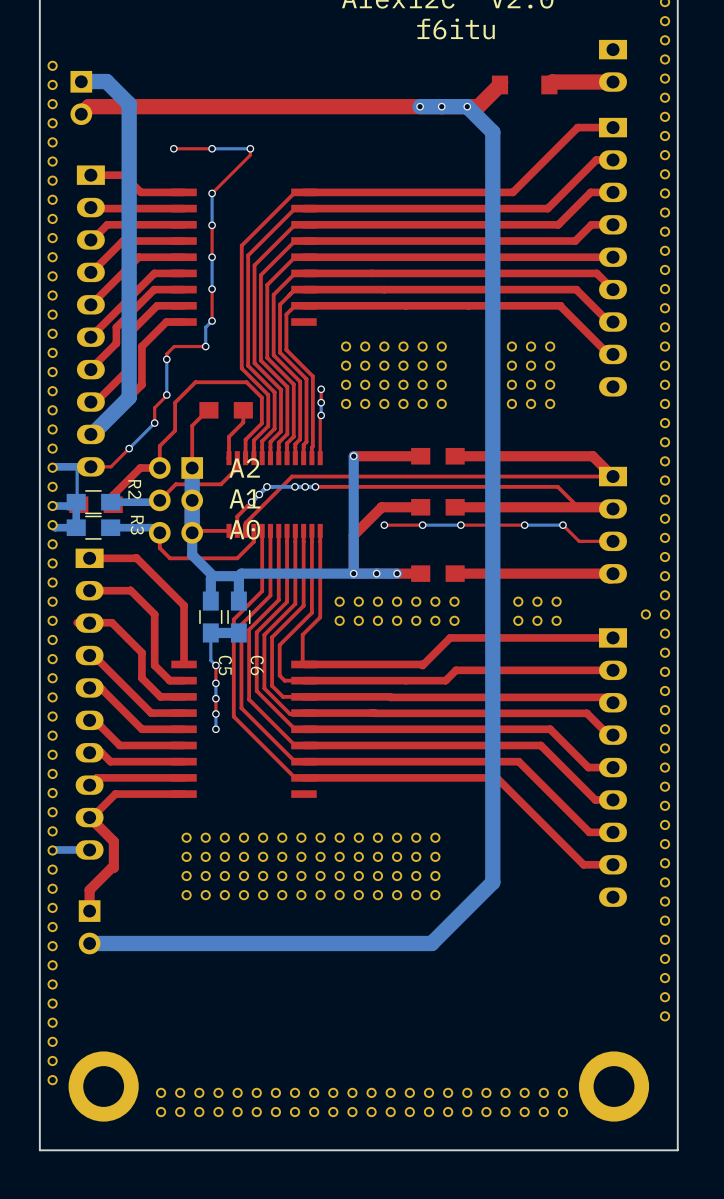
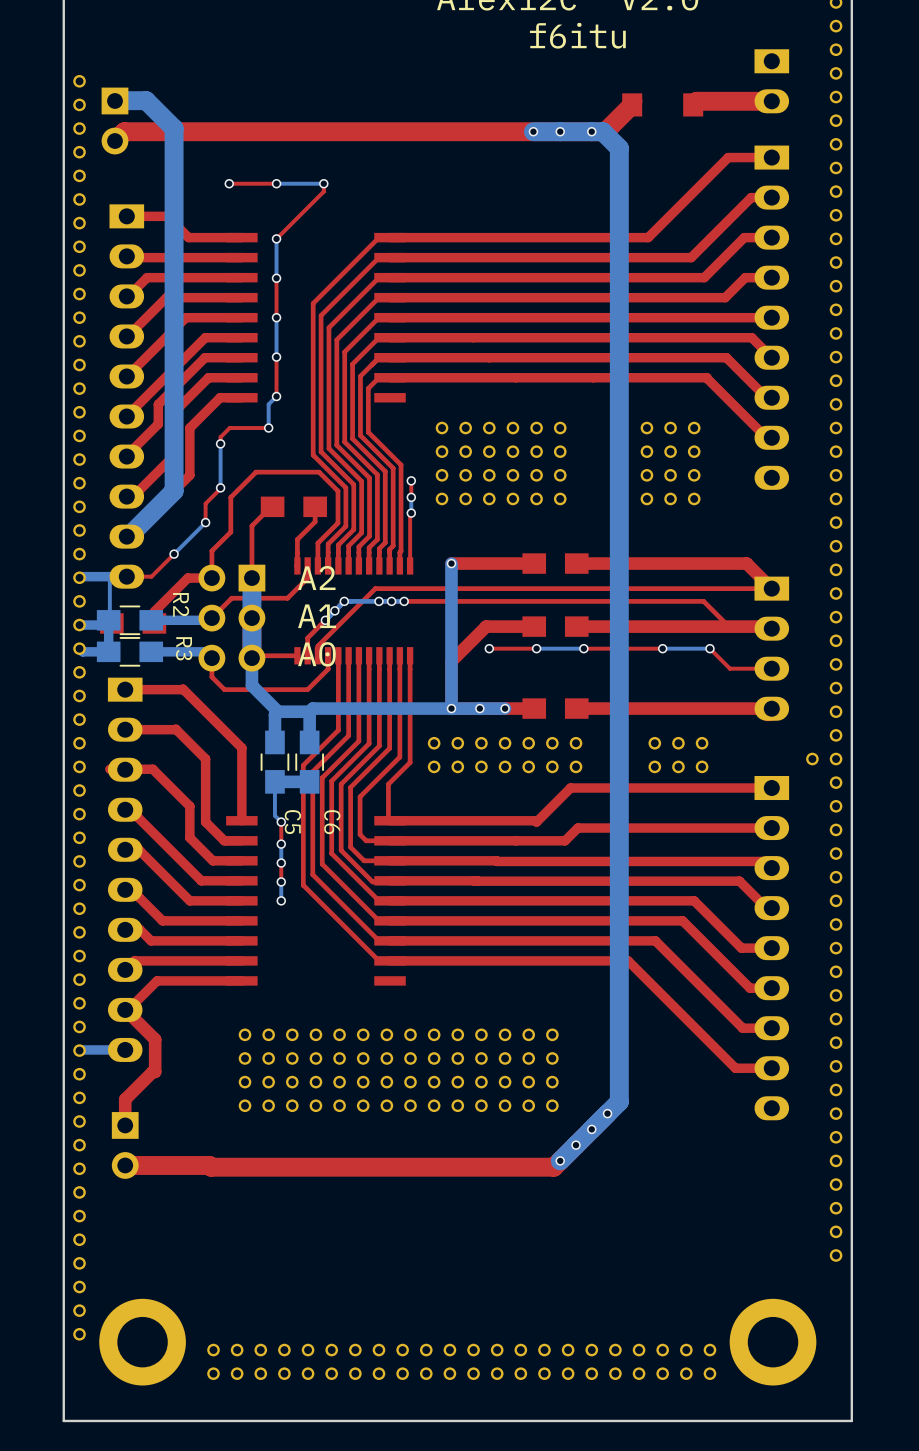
bottom track: (467, 106) (492, 132) (492, 882) (431, 943) (89, 943) -> (591, 131) (602, 131) (619, 148) (619, 1101) (560, 1160)
top track: none -> (607, 1113) (553, 1167) (125, 1165)
via: none -> (607, 1113)
via: none -> (591, 1129)
via: none -> (576, 1145)
via: none -> (560, 1160)

